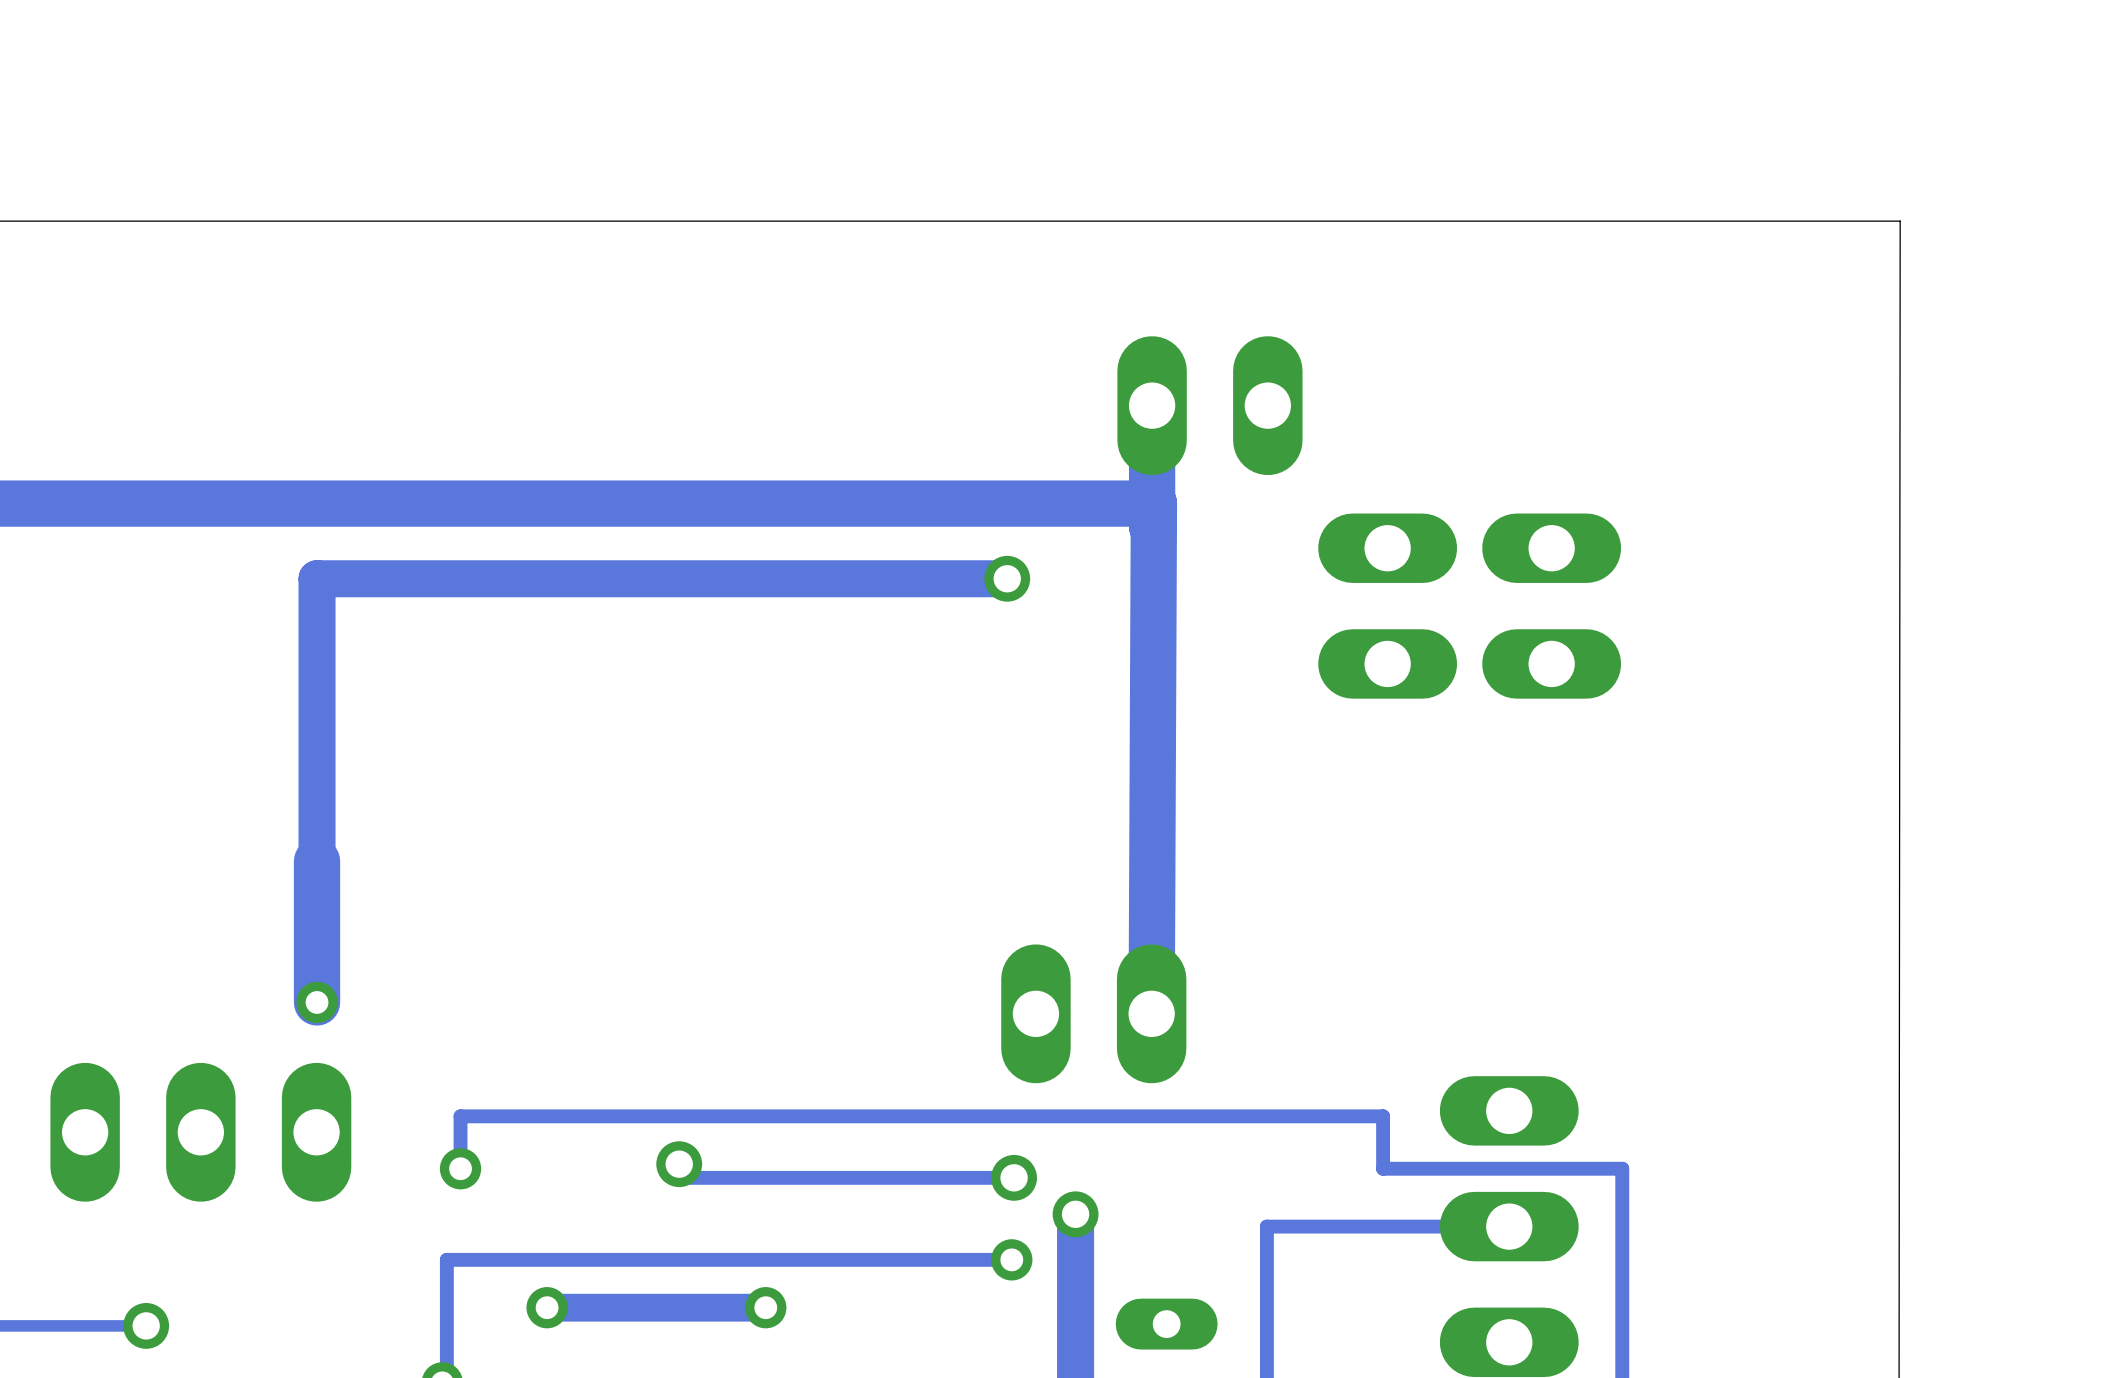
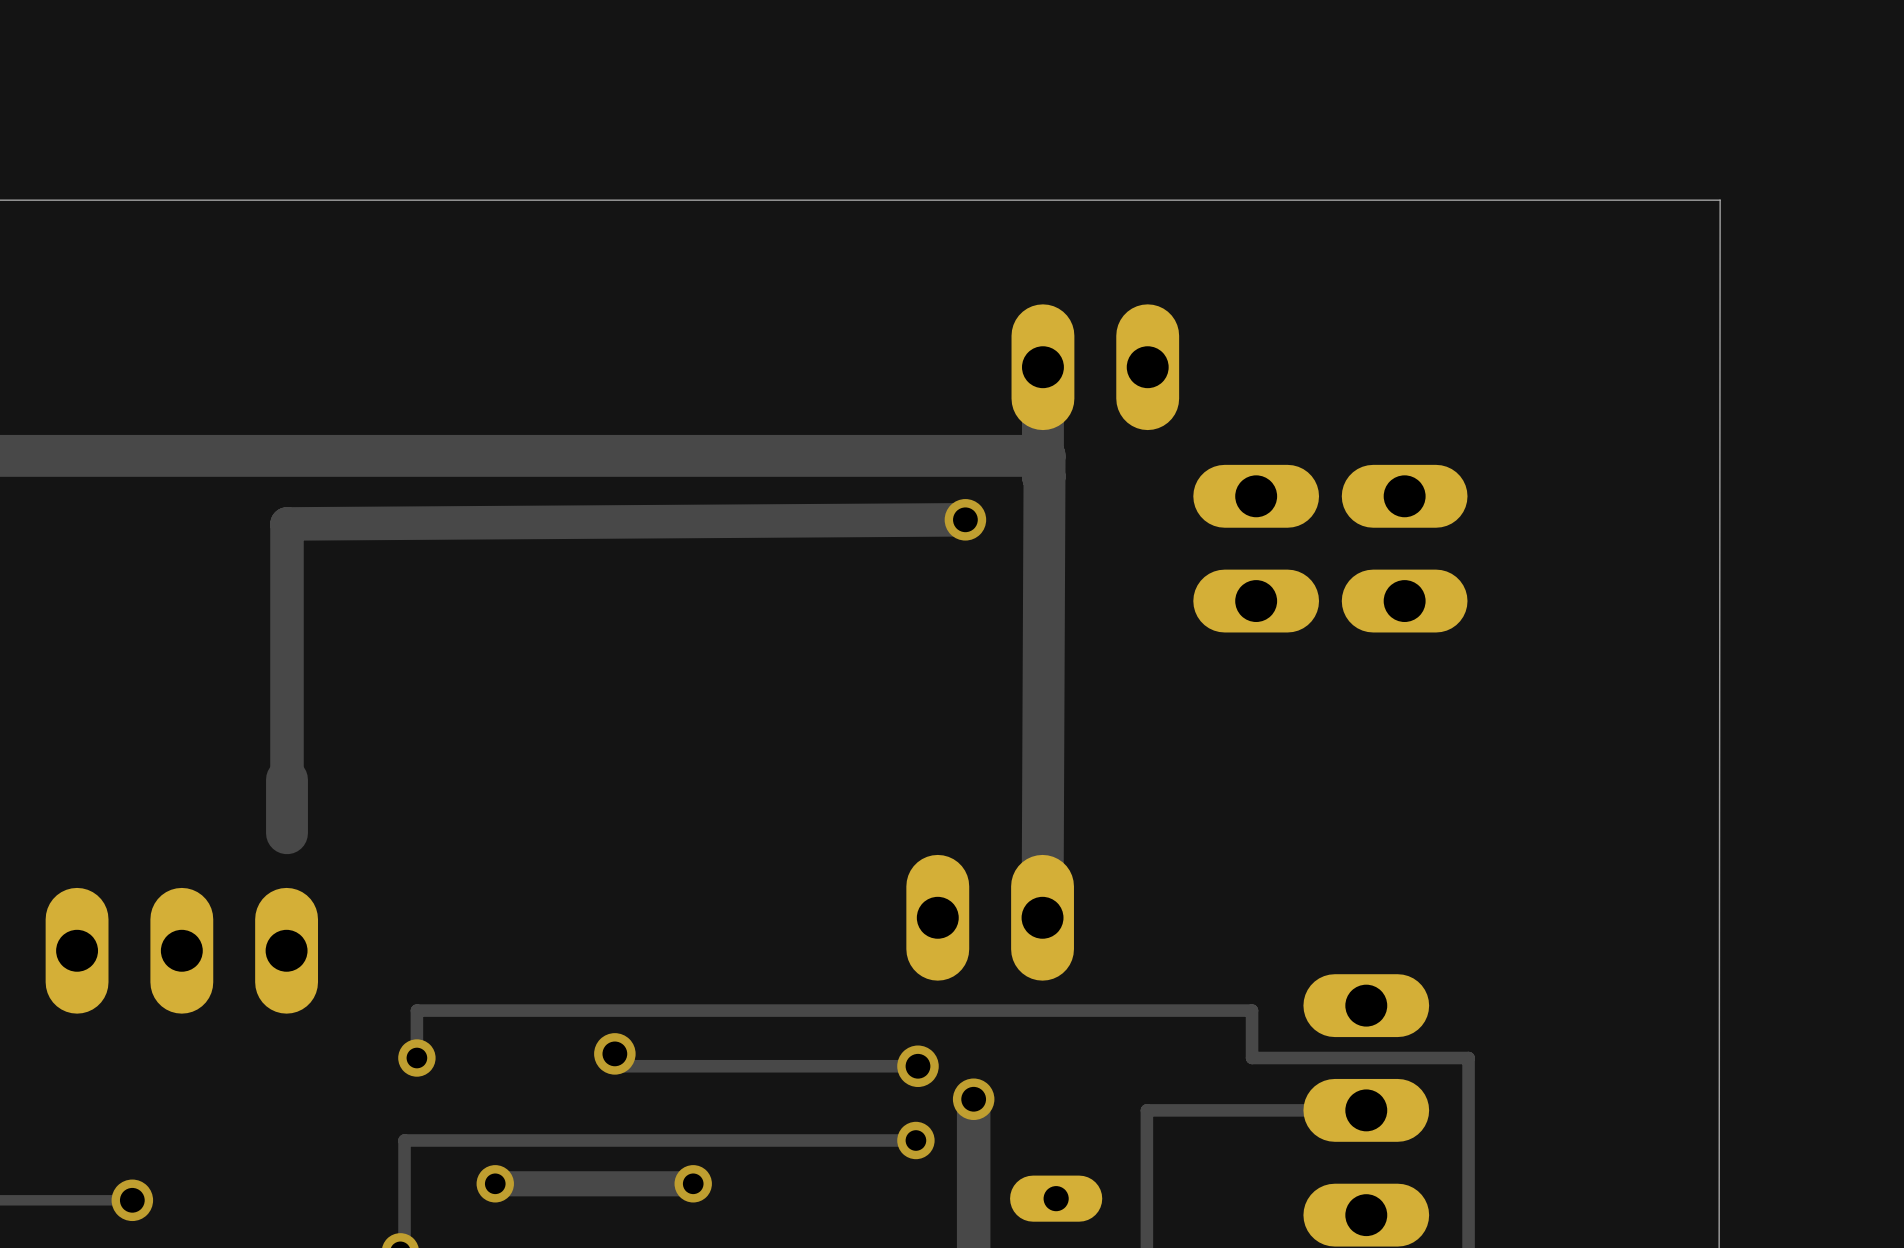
track: (1007, 578) (317, 578) -> (965, 519) (286, 523)
via position: (1007, 578) -> (965, 519)
track: (317, 920) (317, 1002) -> none
via: (317, 1002) -> none
part position: (200, 1132) -> (181, 950)

